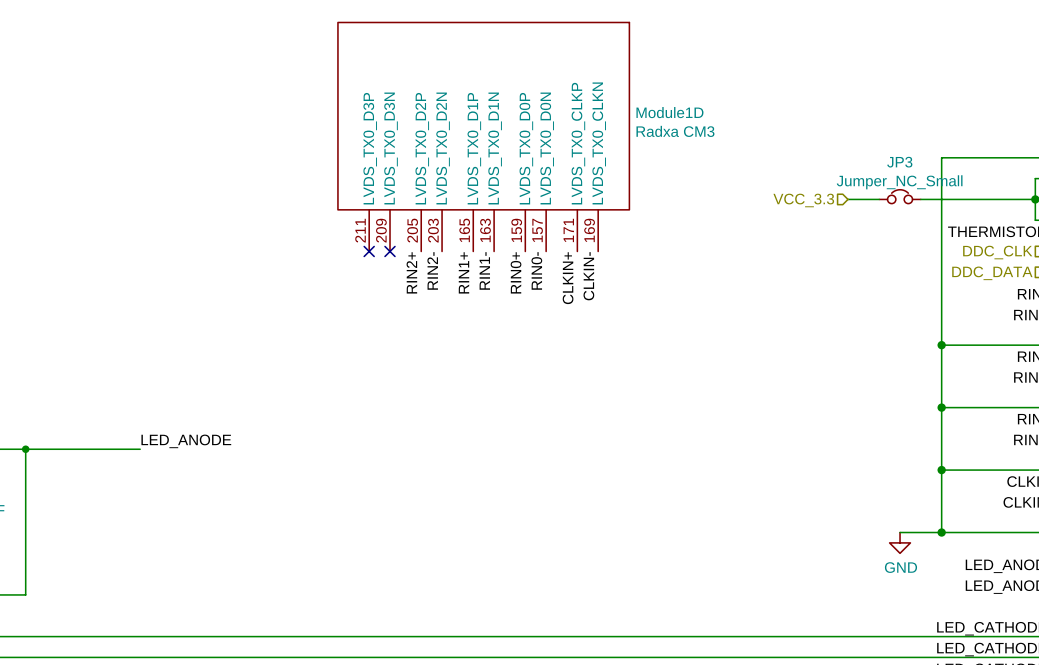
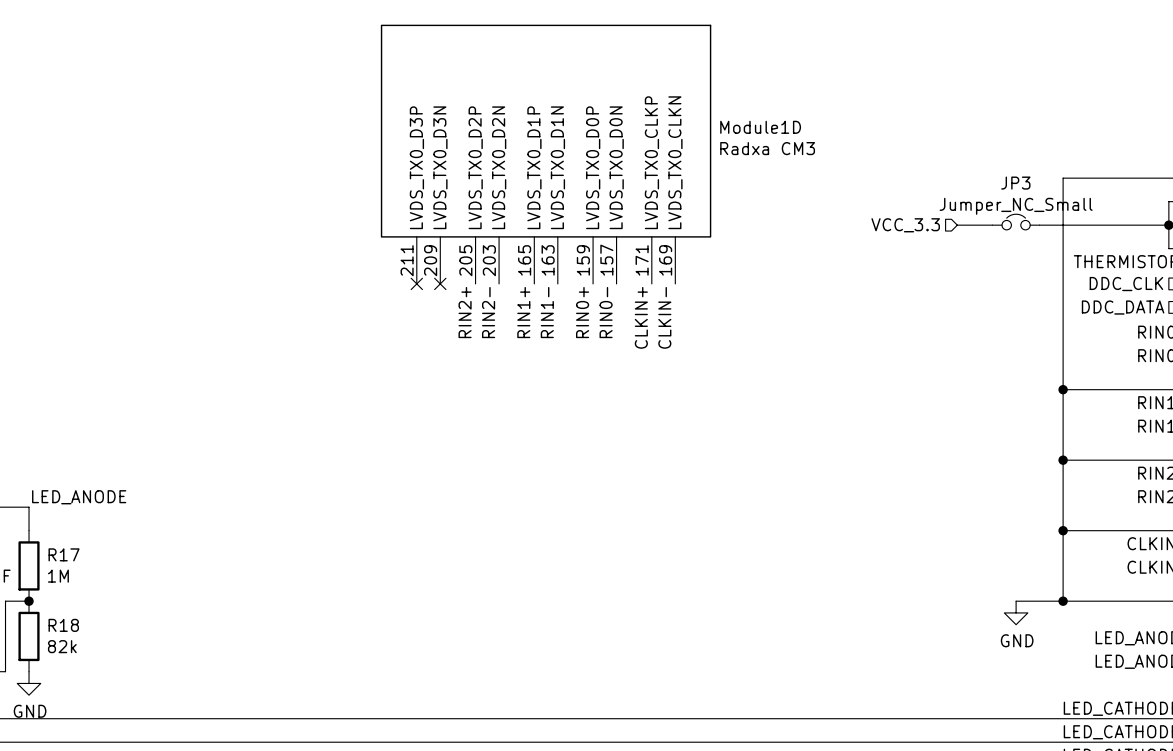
label position: LED_ANODE (186, 441) -> LED_ANODE (79, 497)
wire: (25, 449) (140, 449) -> none
junction: (25, 449) -> none
wire: (25, 470) (25, 594) (4, 594) -> (29, 601) (5, 601) (5, 671)
R17: none -> 1M (29, 565)
junction: none -> (29, 601)
R18: none -> 82k (29, 636)
power symbol: none -> GND (29, 683)

